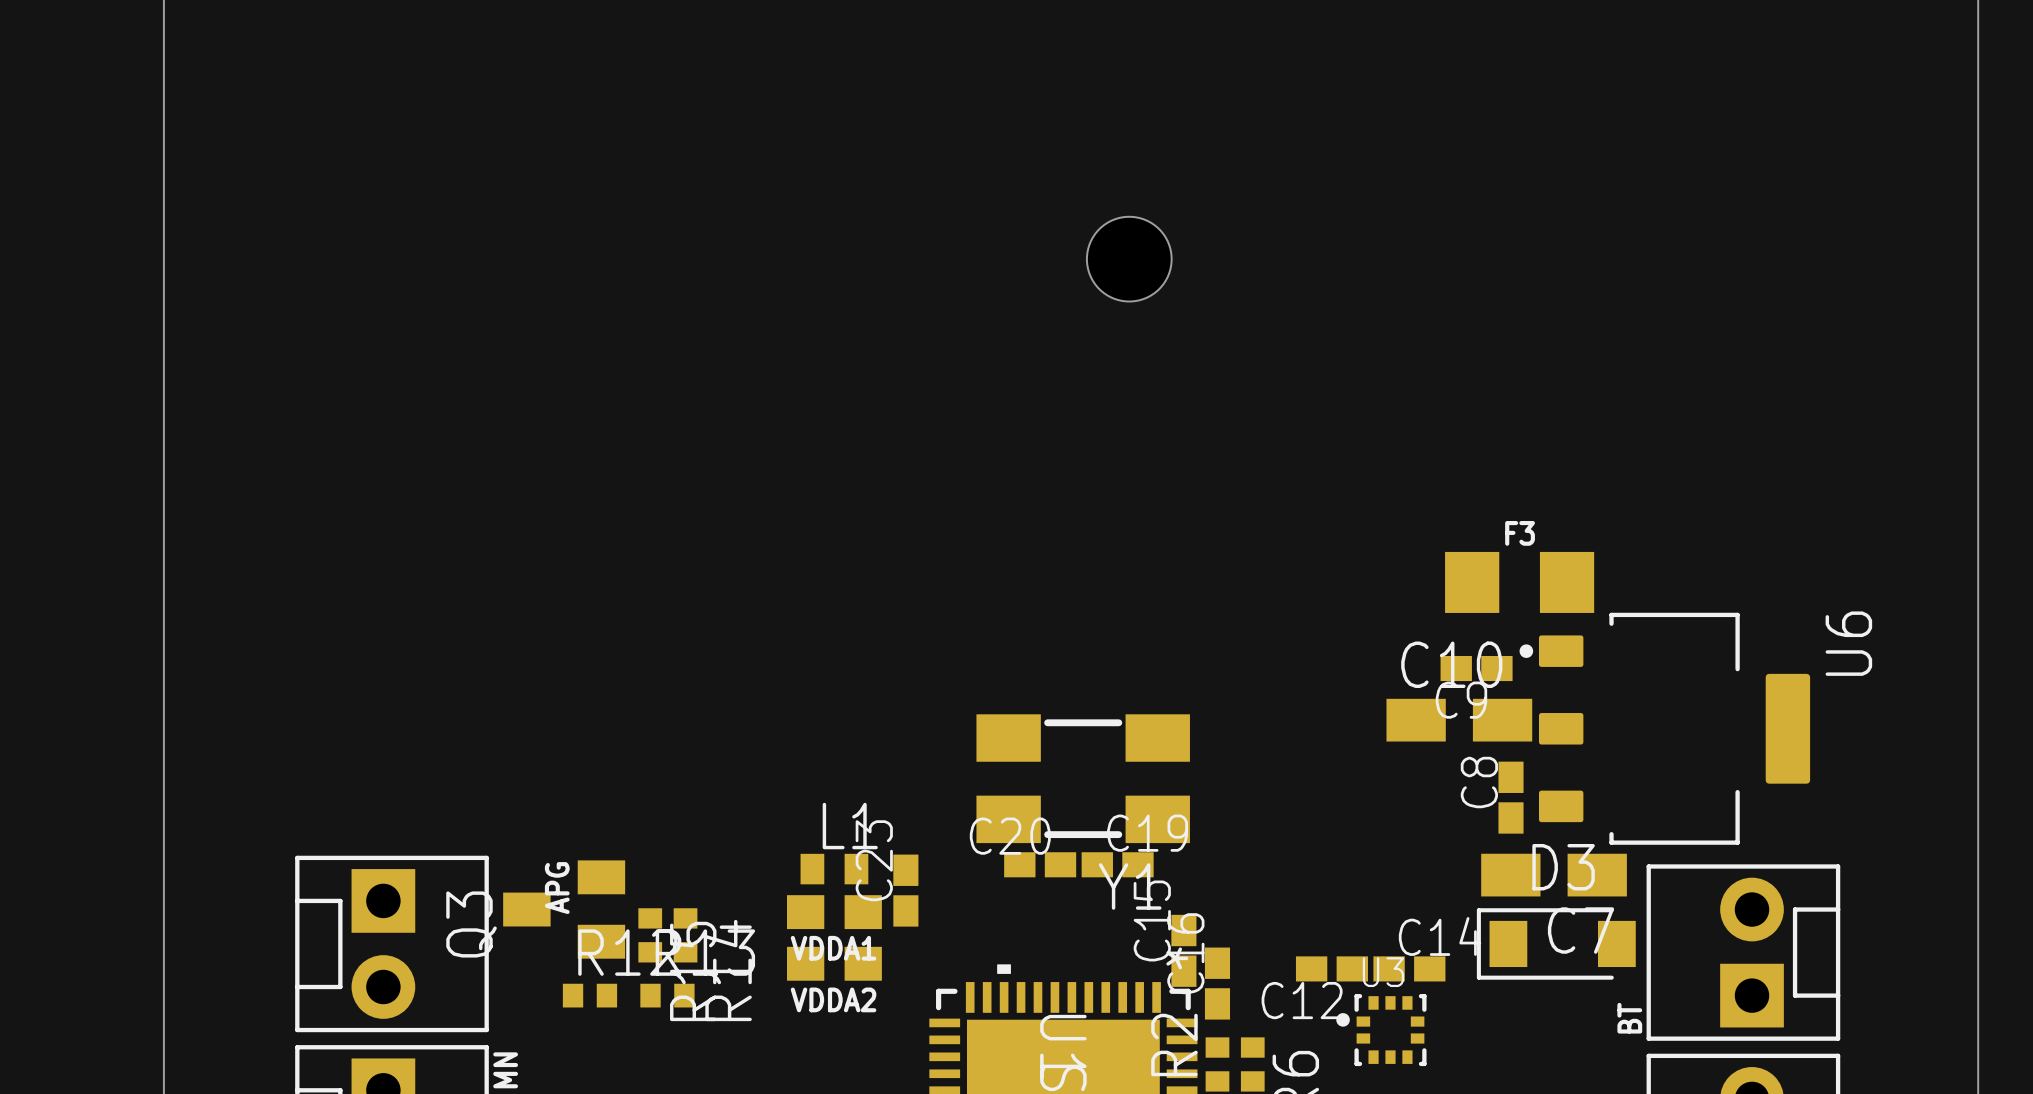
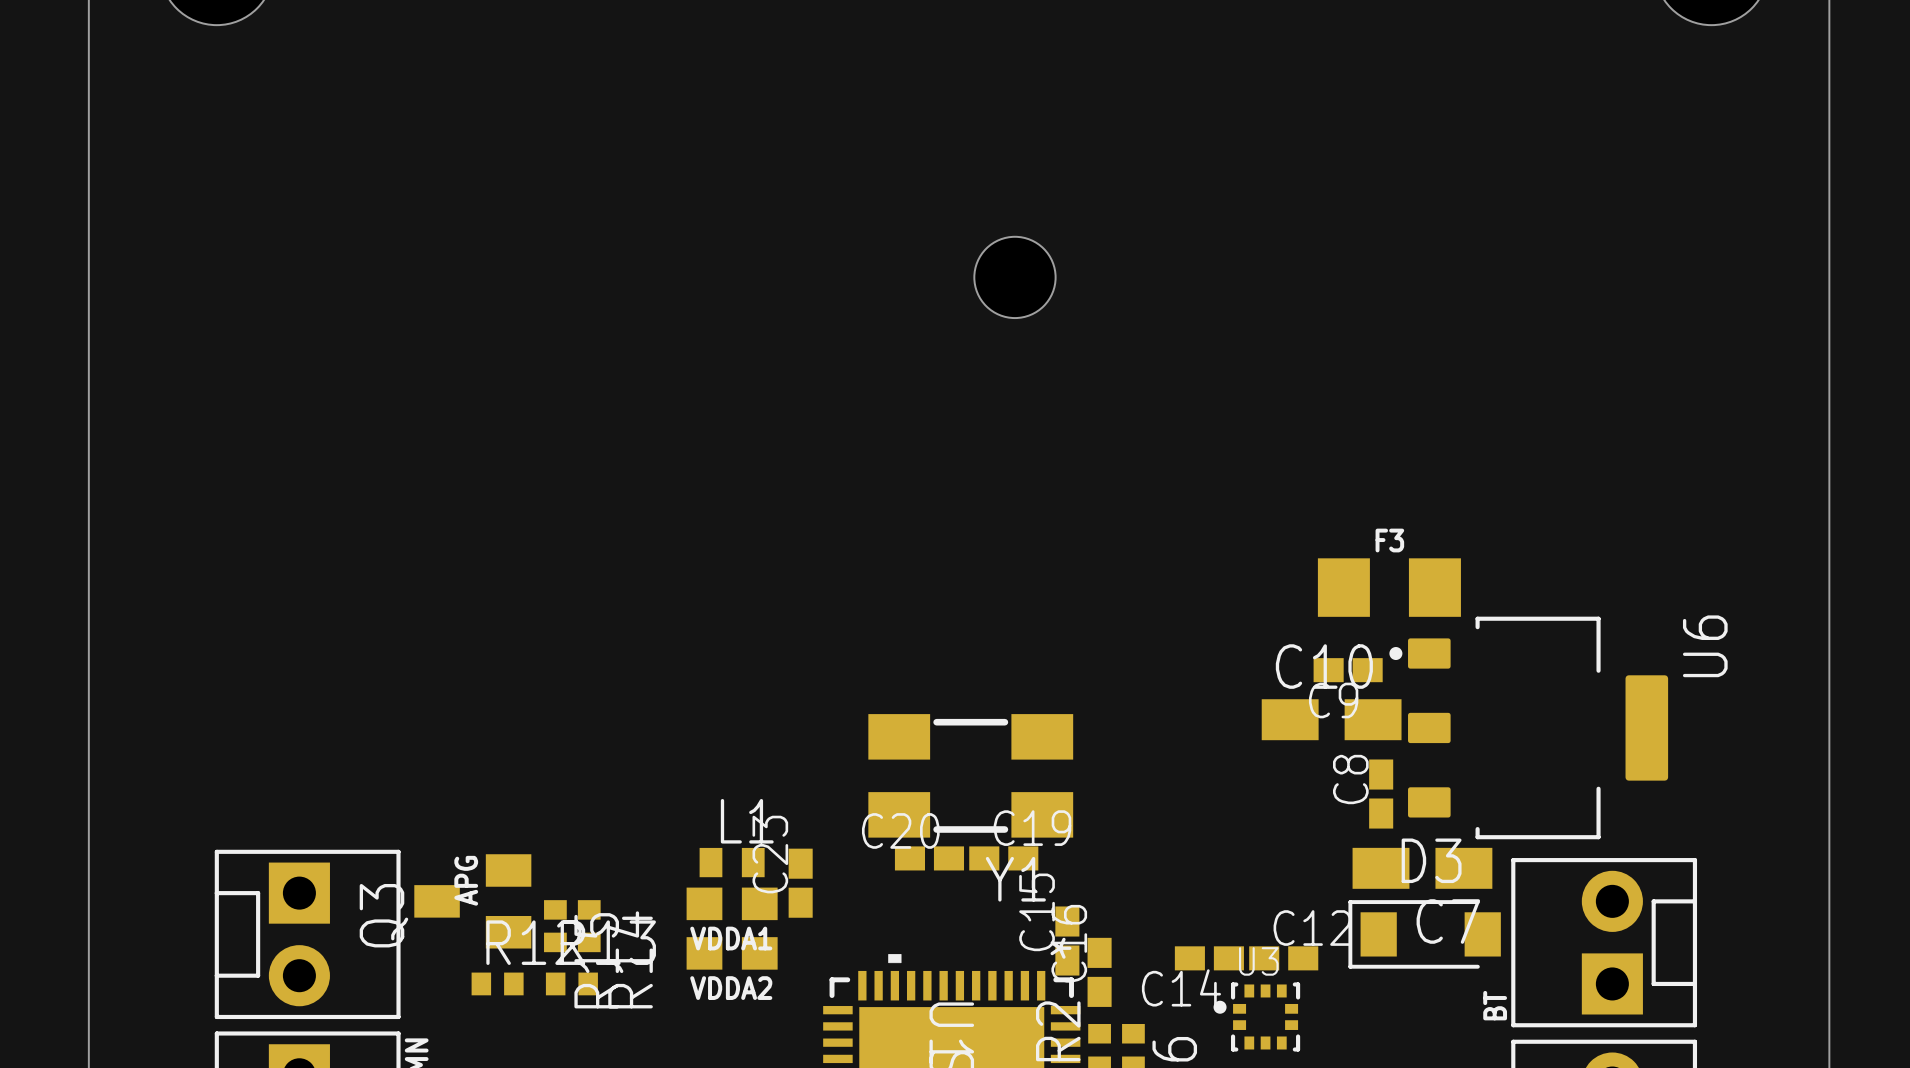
C14 name: C14 (1440, 936) -> C12 (1312, 928)
C12 name: C12 (1302, 1000) -> C14 (1181, 987)

